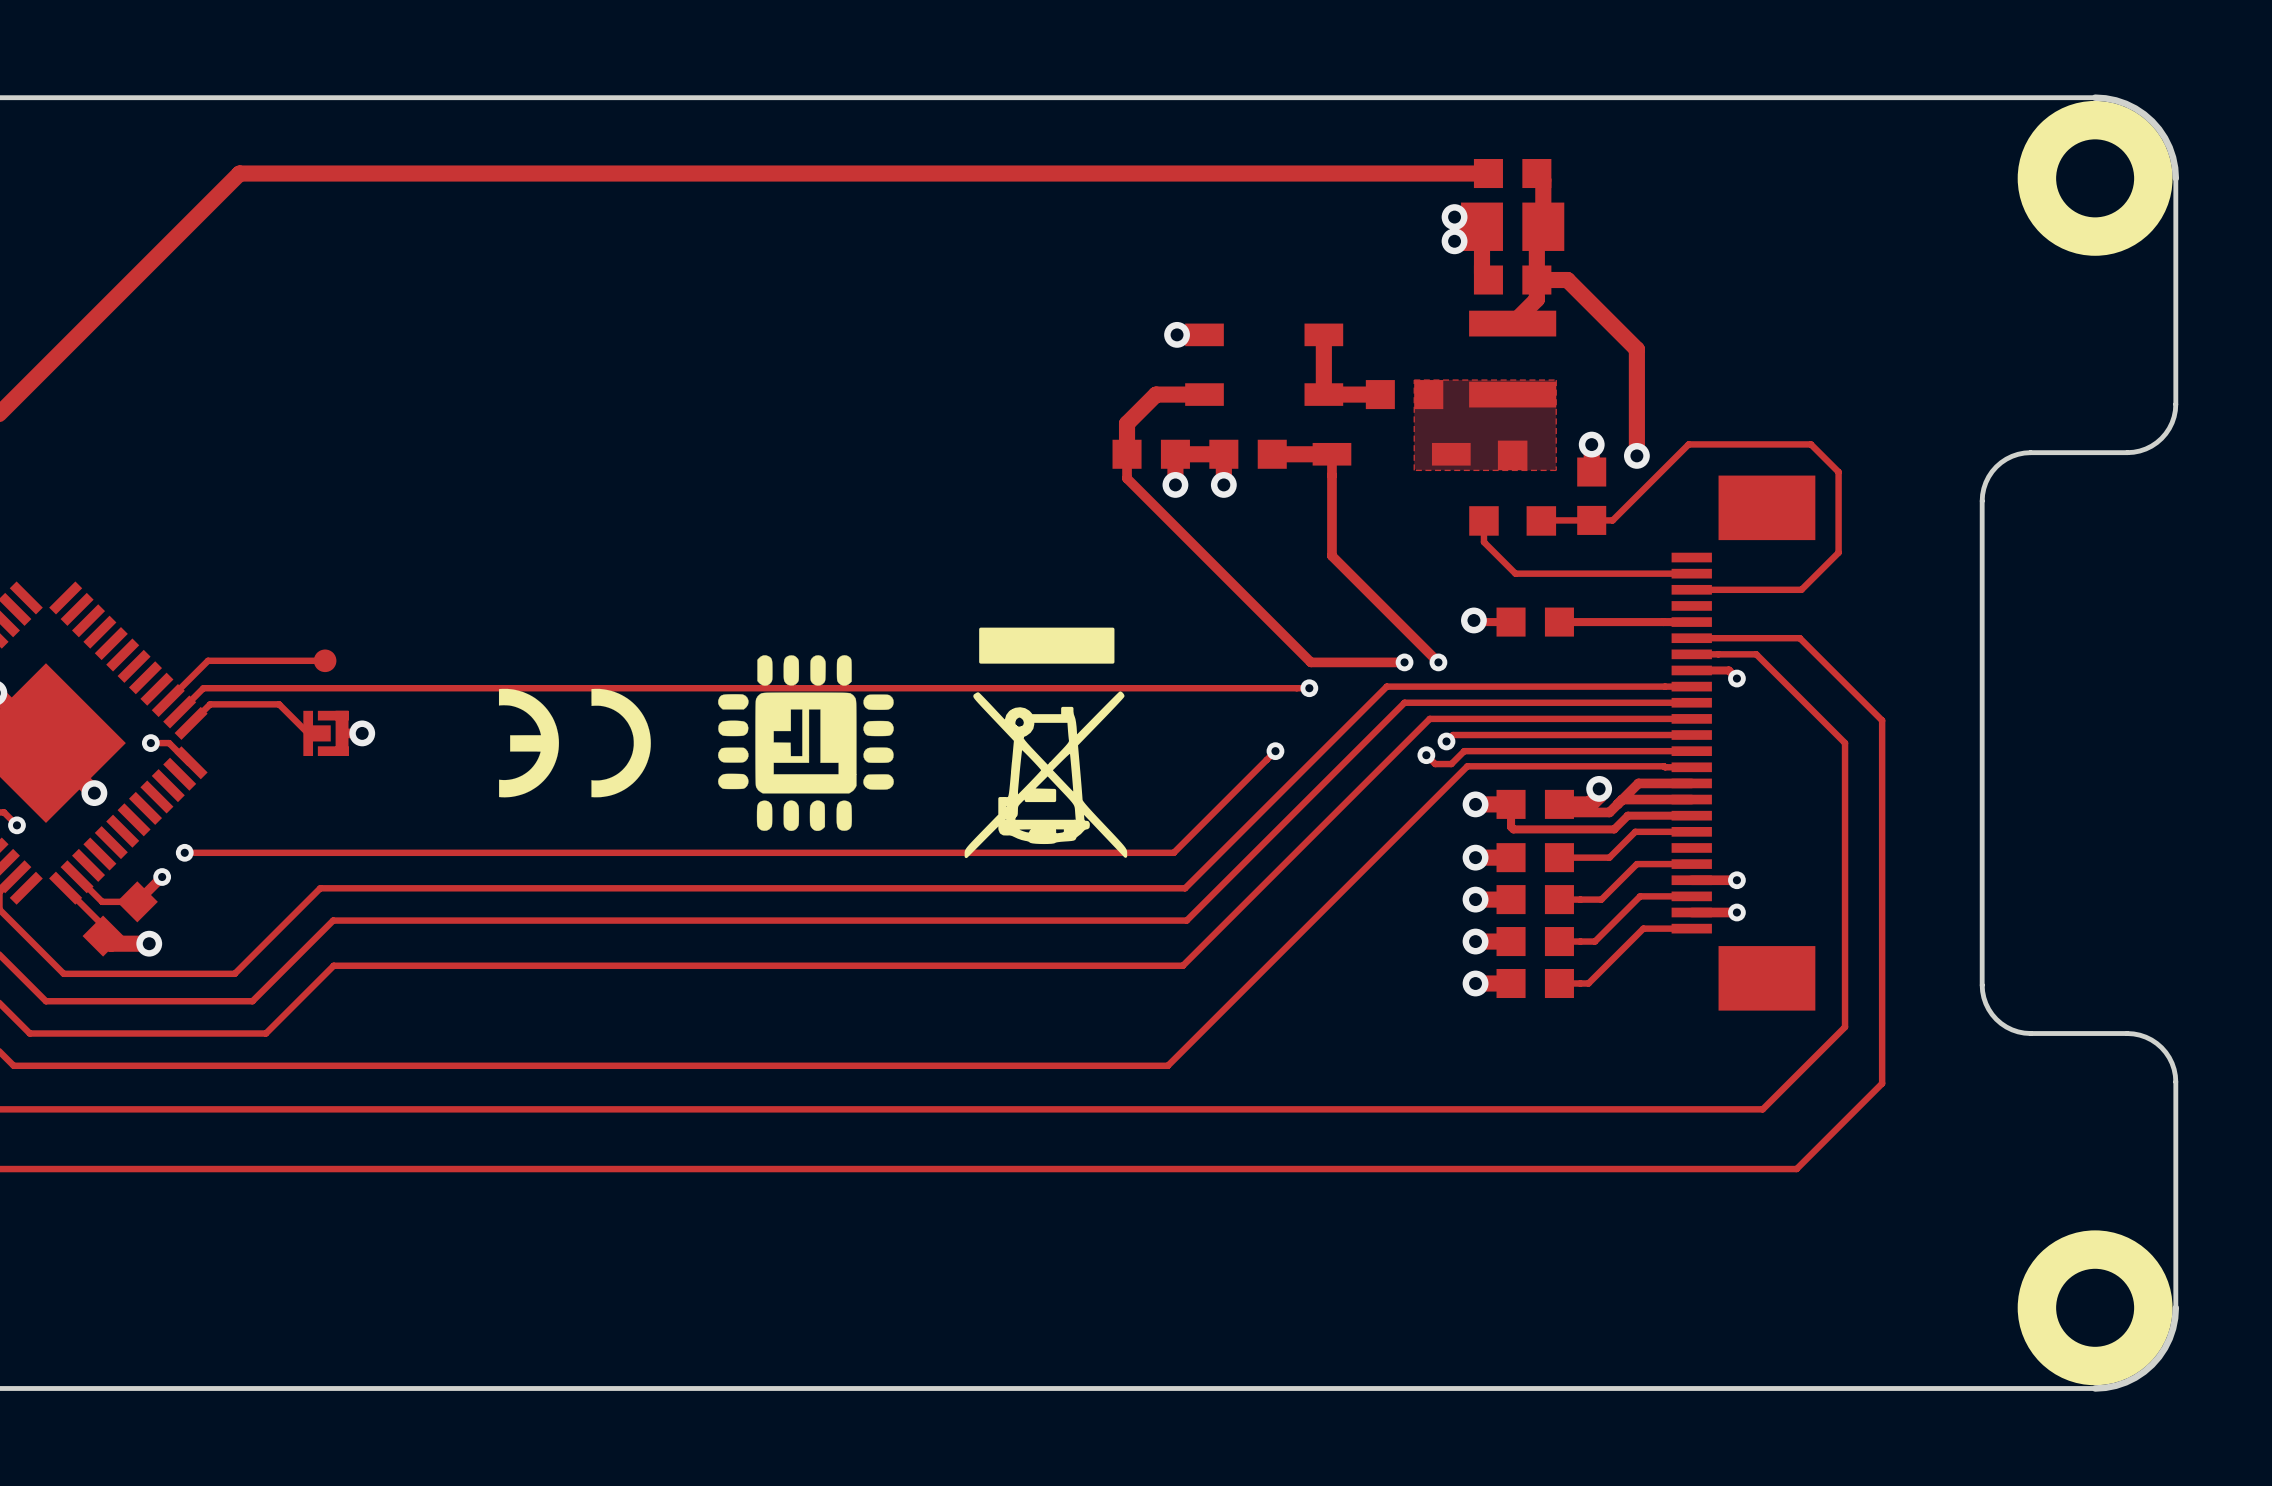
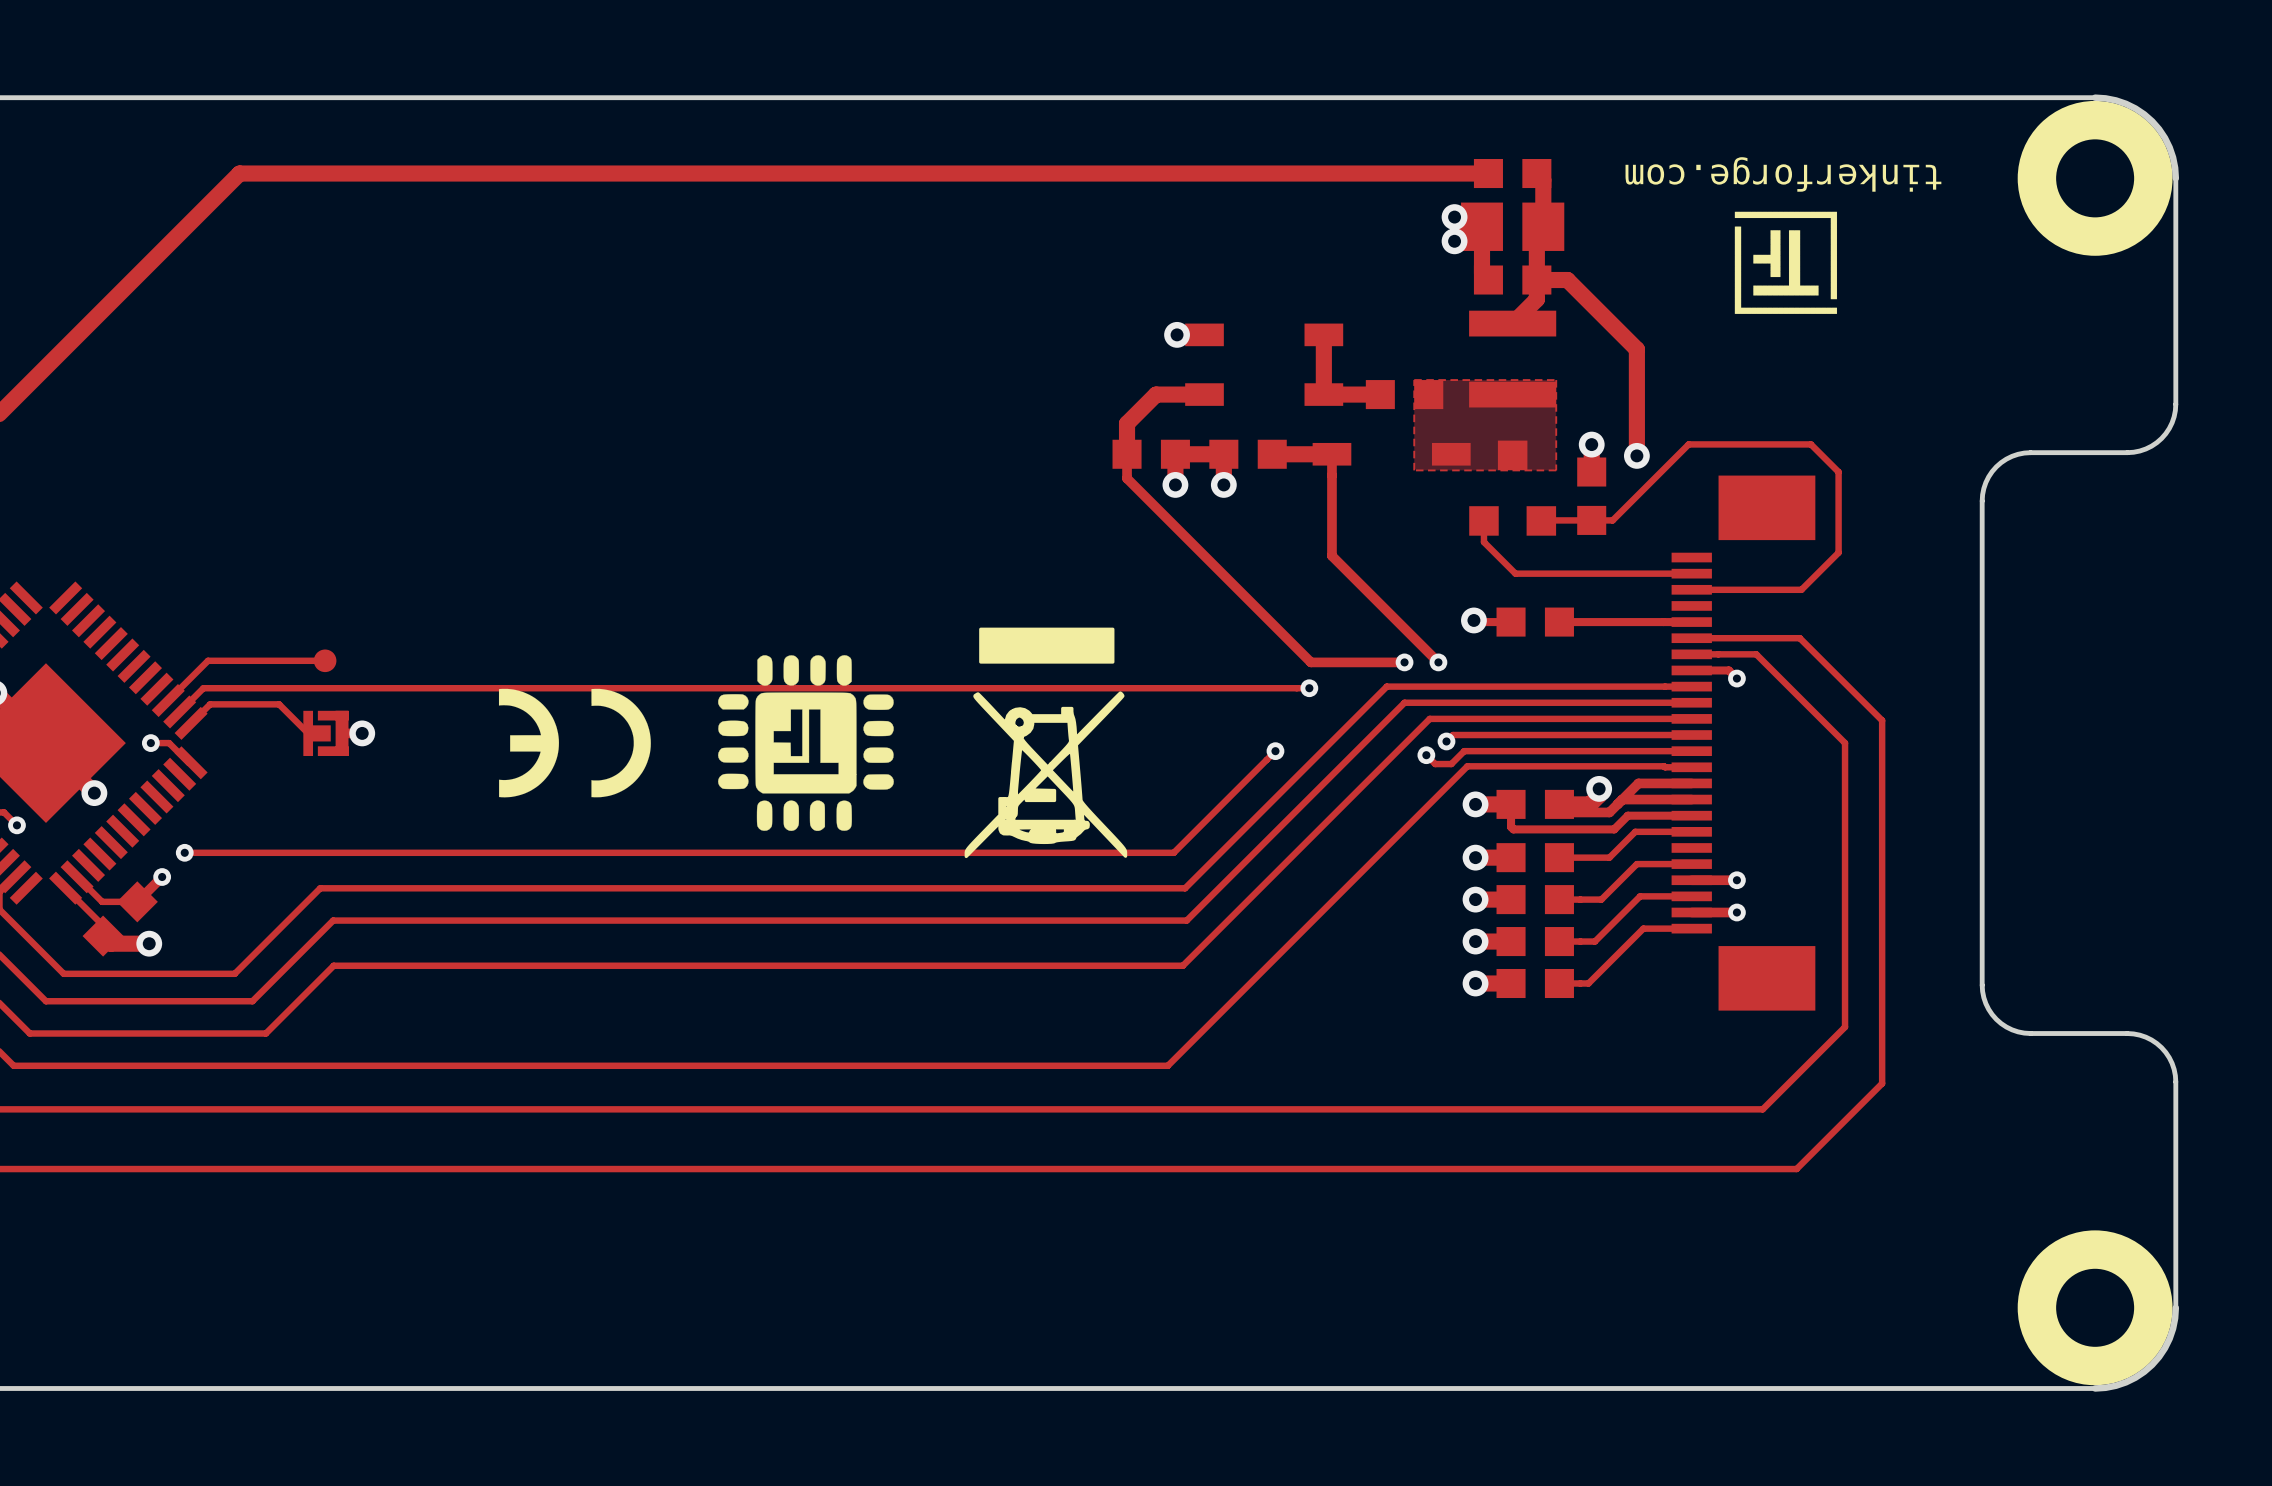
text: none -> tinkerforge.com (1783, 174)
drawing: none -> [1734, 211, 1838, 314]

